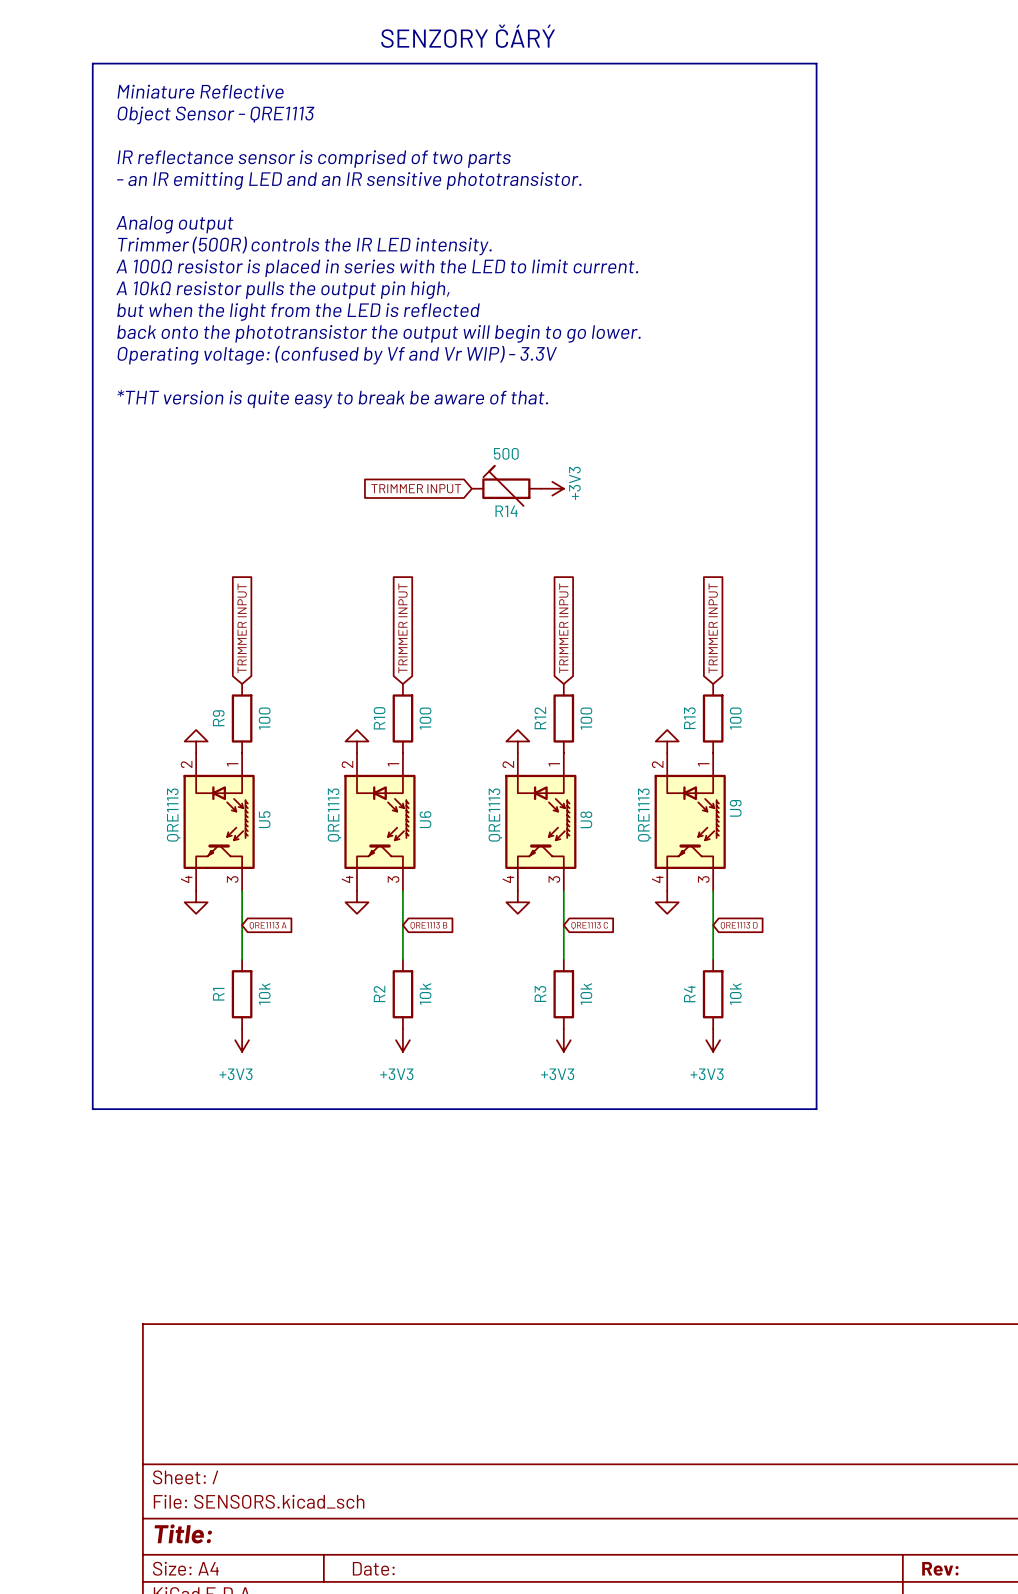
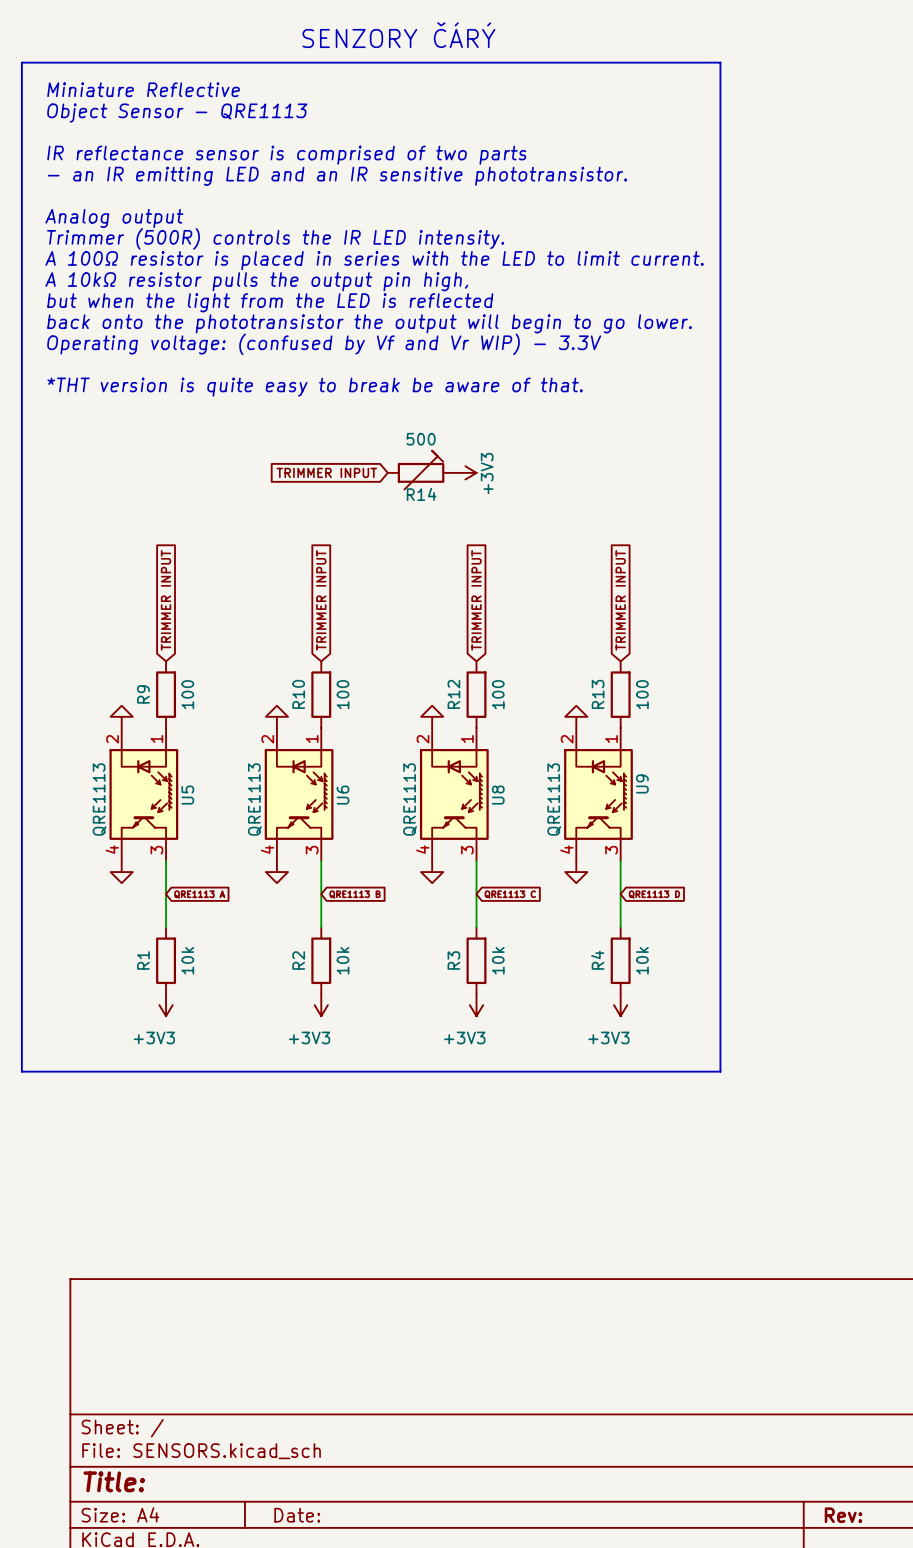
R14 flip: as is (506, 485) -> left-right (421, 470)

